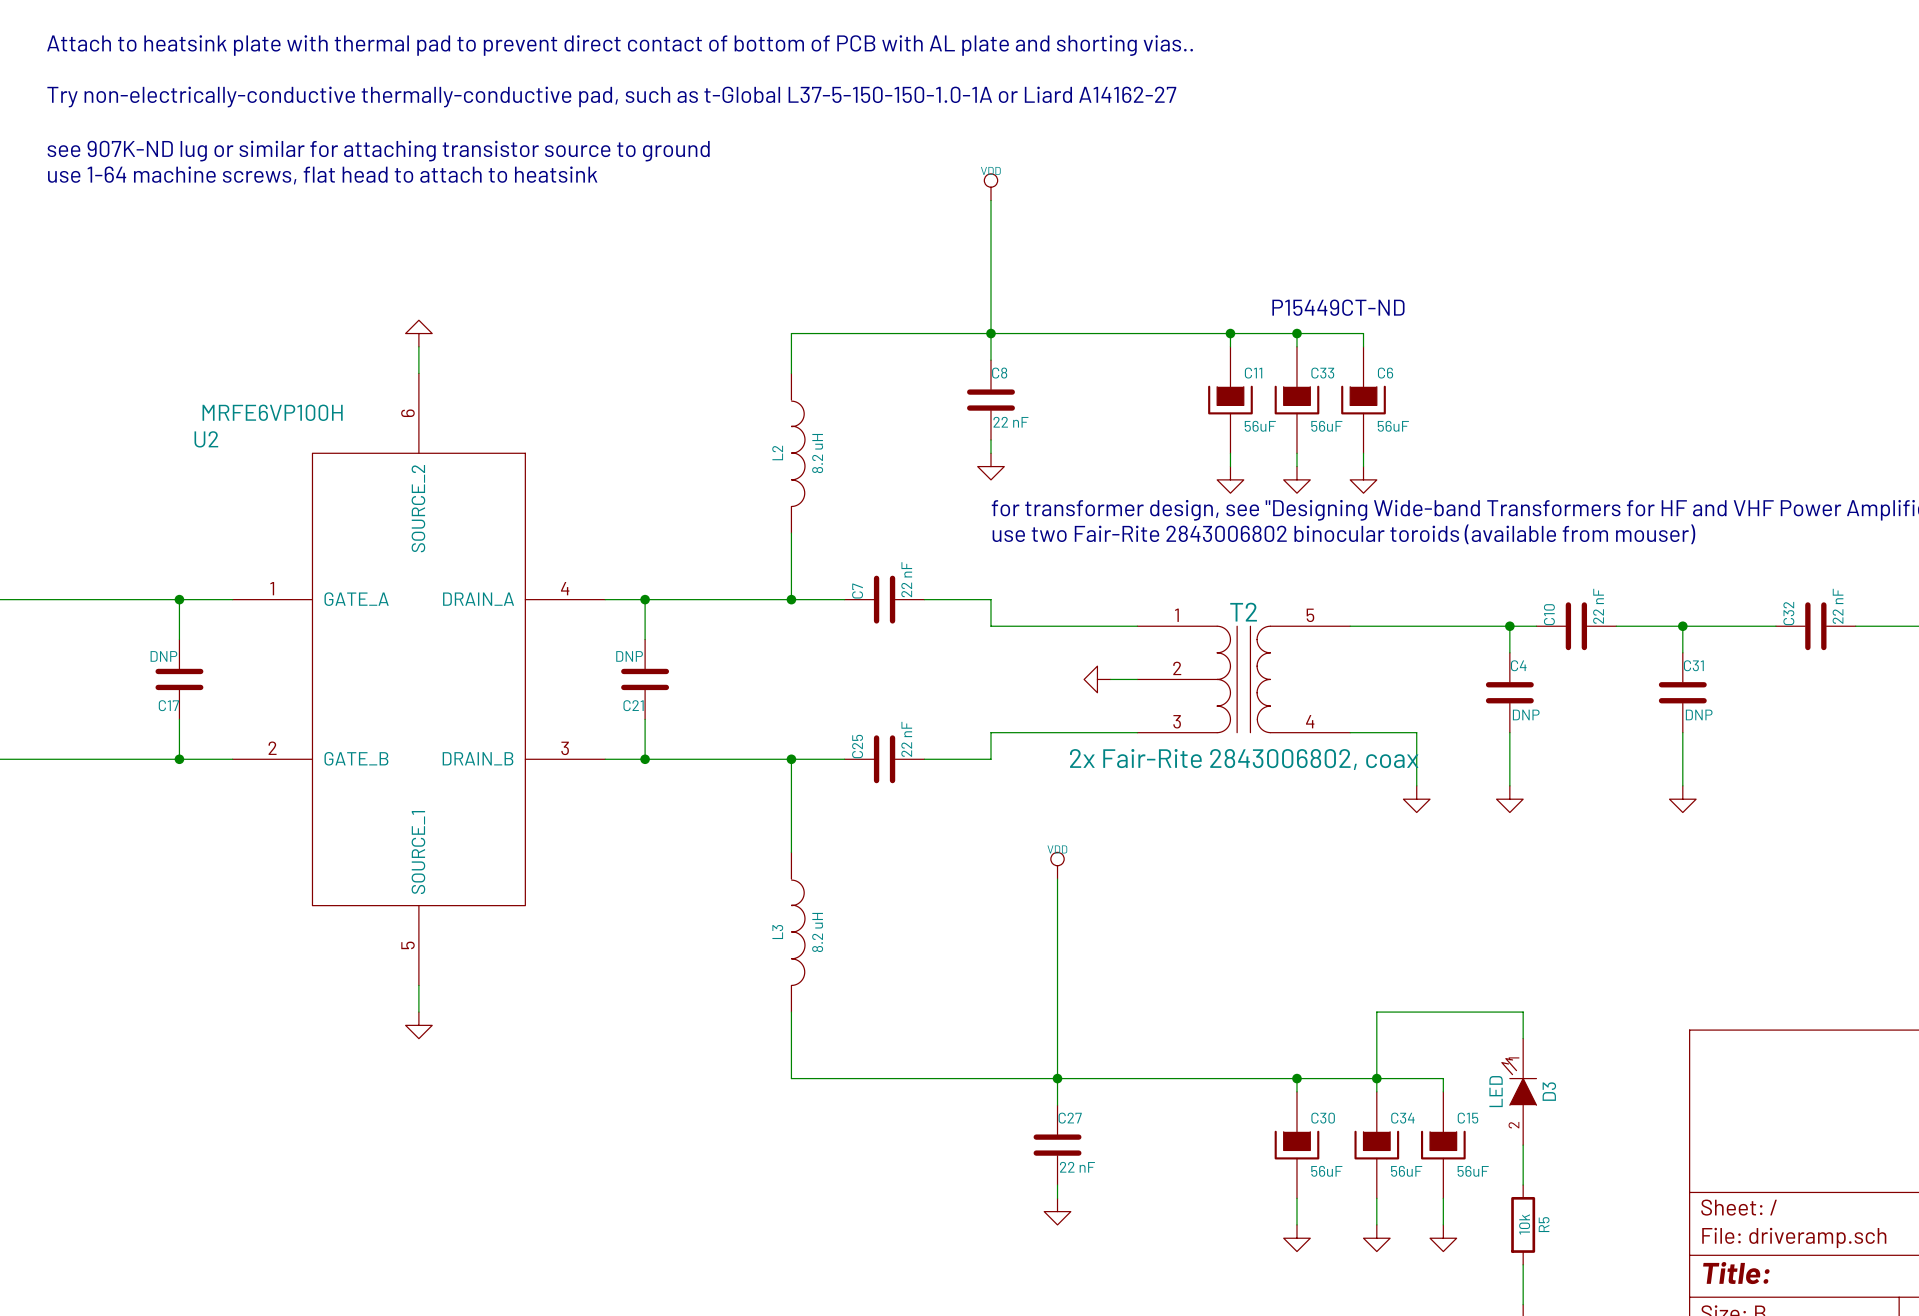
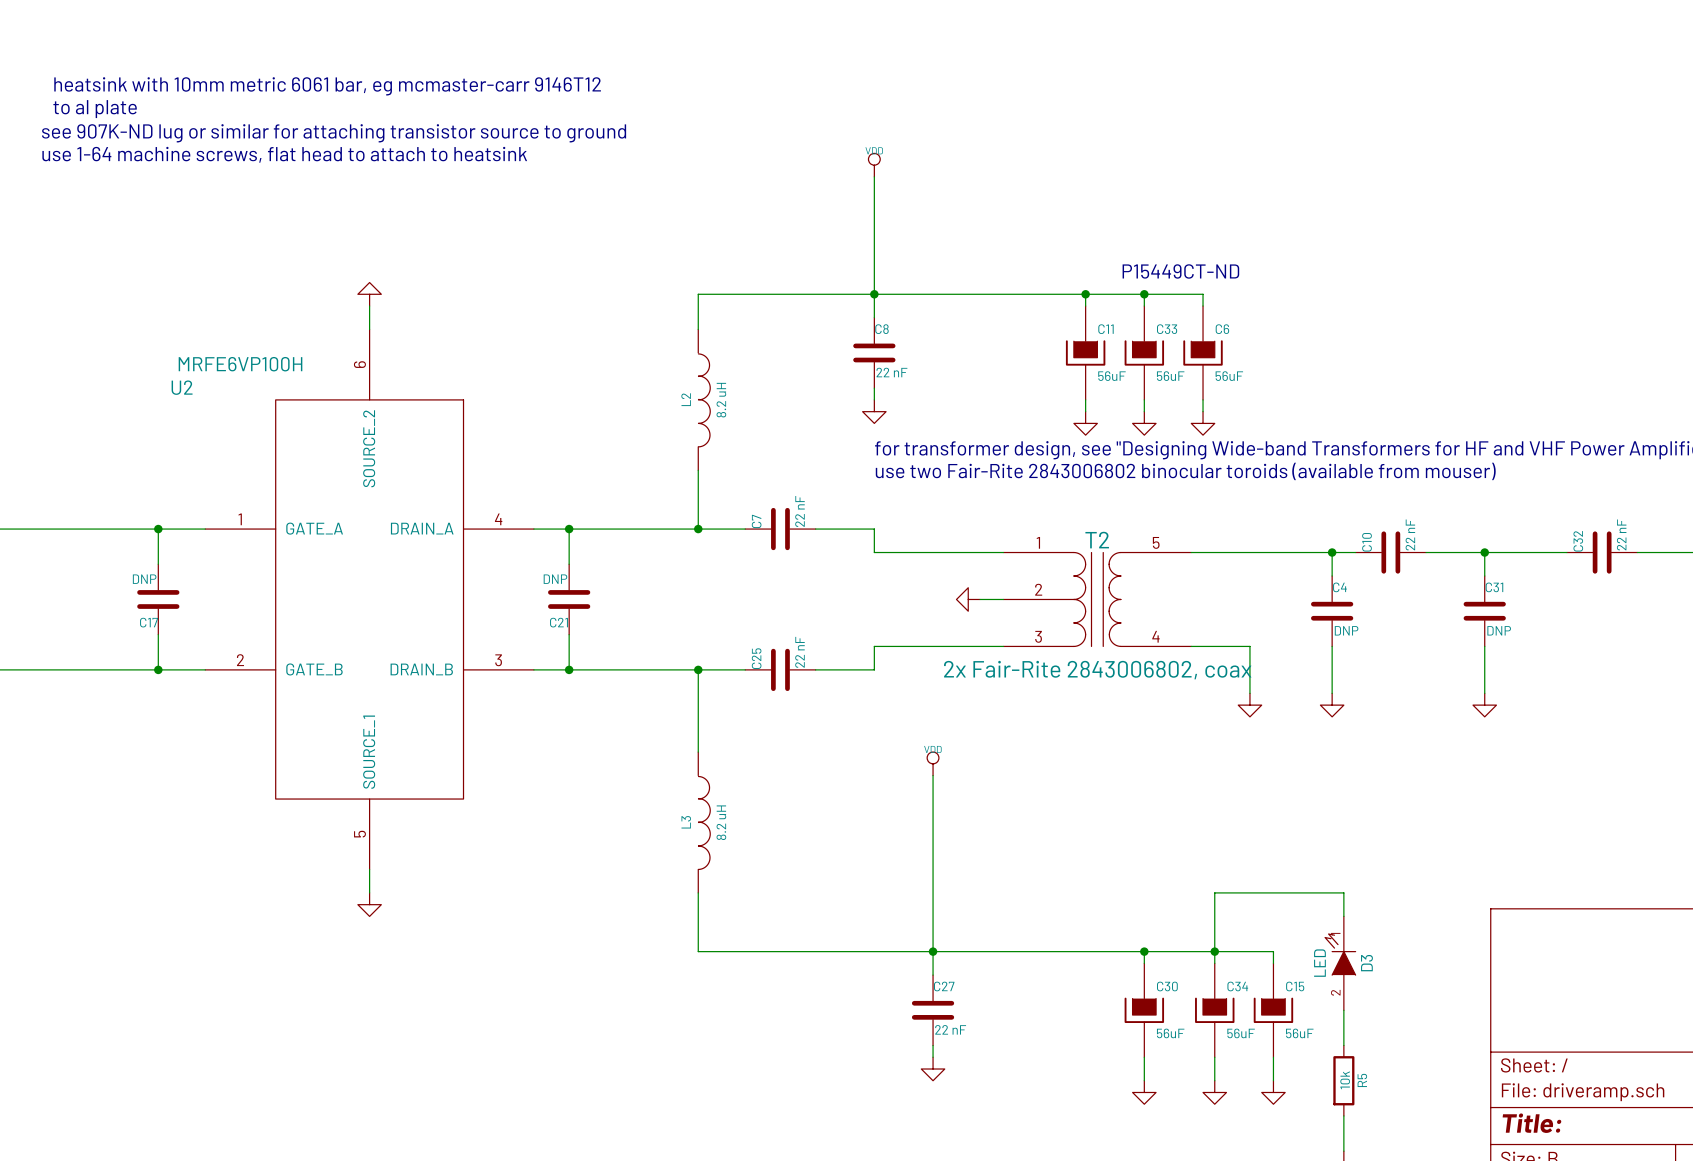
text: Attach to heatsink plate with thermal pad to prevent direct contact of bottom of PCB with AL plate and shorting vias.. (620, 45) -> none
text: Try non-electrically-conductive thermally-conductive pad, such as t-Global L37-5-150-150-1.0-1A or Liard A14162-27 (611, 96) -> none
text: none -> heatsink with 10mm metric 6061 bar, eg mcmaster-carr 9146T12 (327, 86)
text: none -> to al plate (95, 109)

